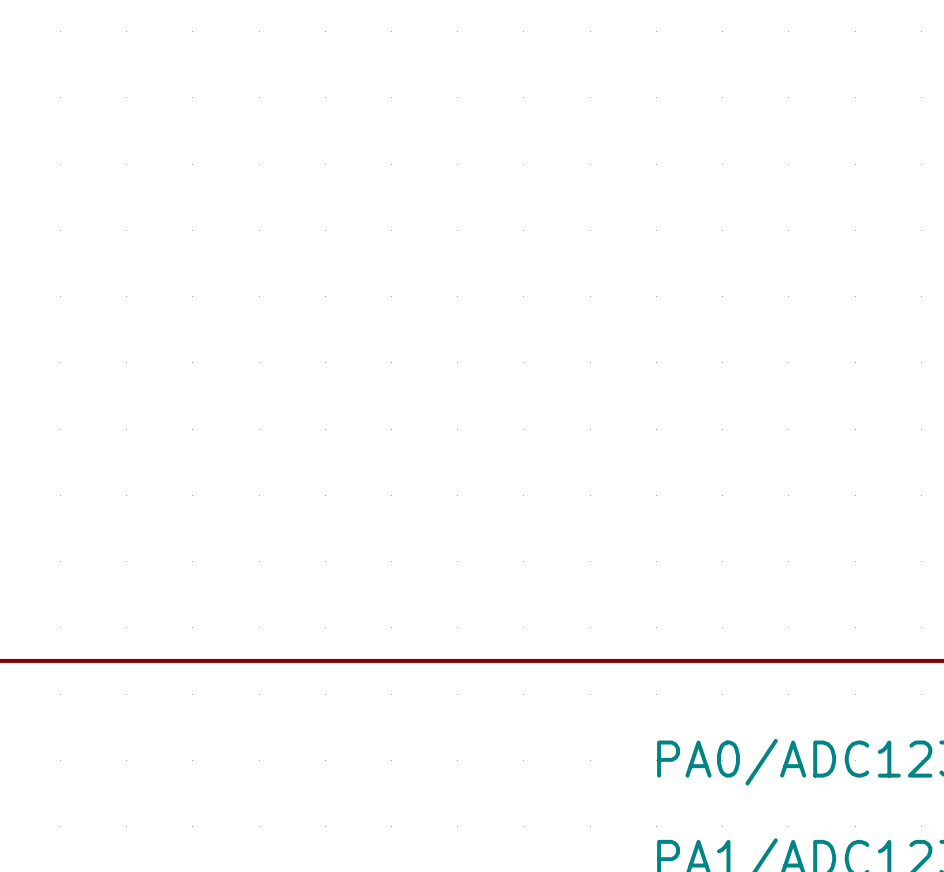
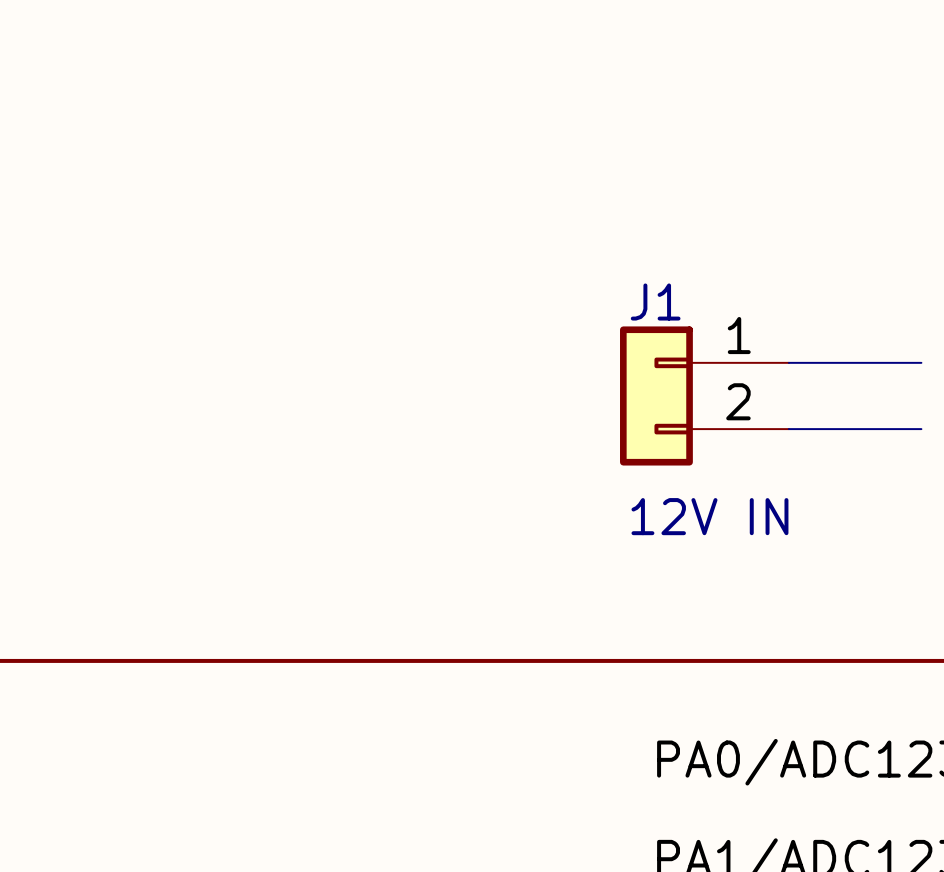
wire: none -> (788, 362) (921, 362)
J1: none -> 12V IN (704, 395)
wire: none -> (788, 429) (921, 429)

